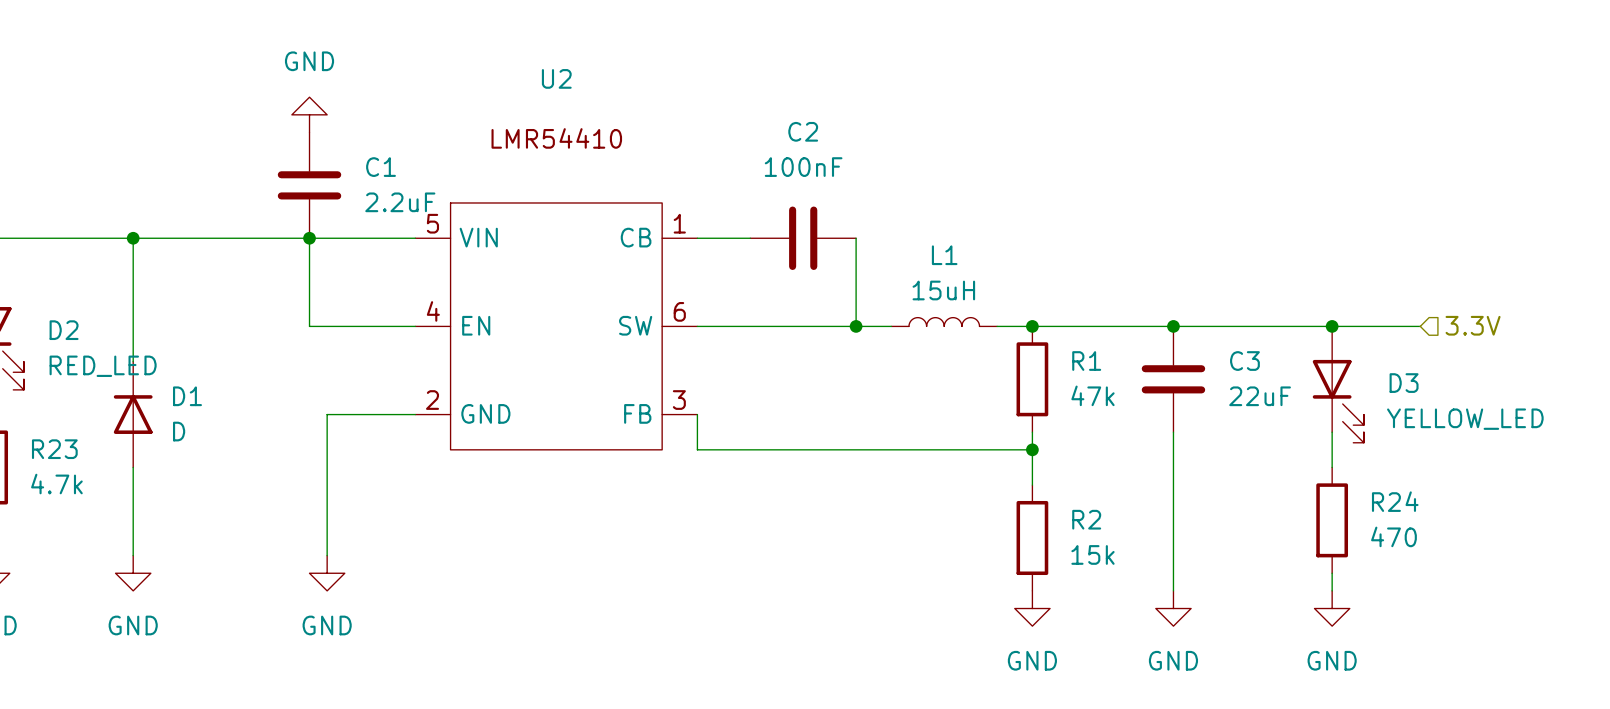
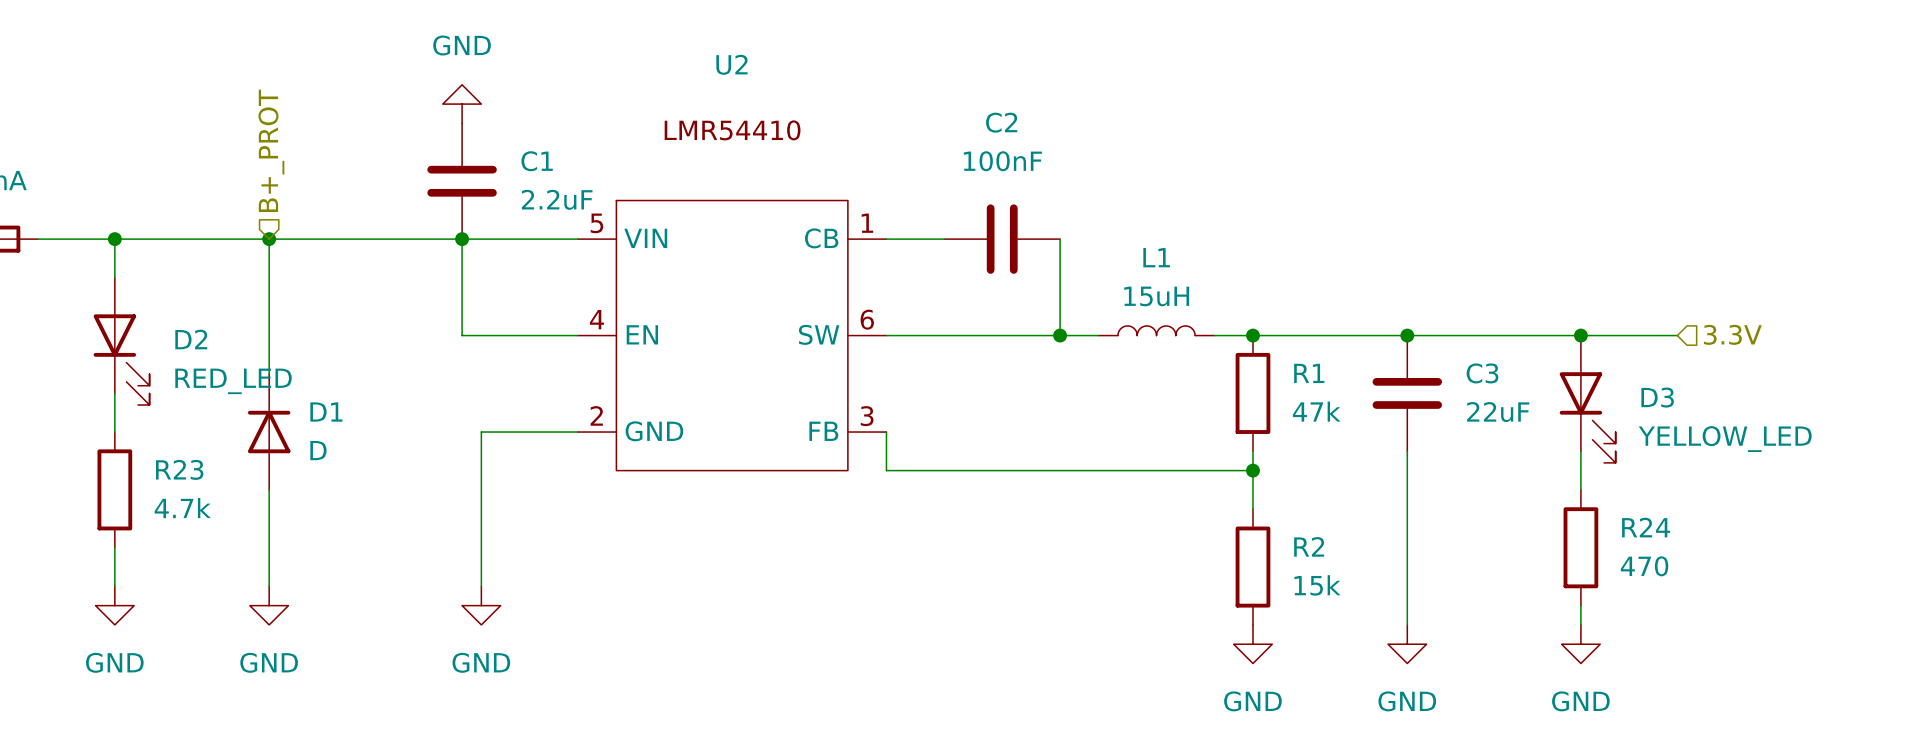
hierarchical label: none -> B+_PROT (271, 150)

